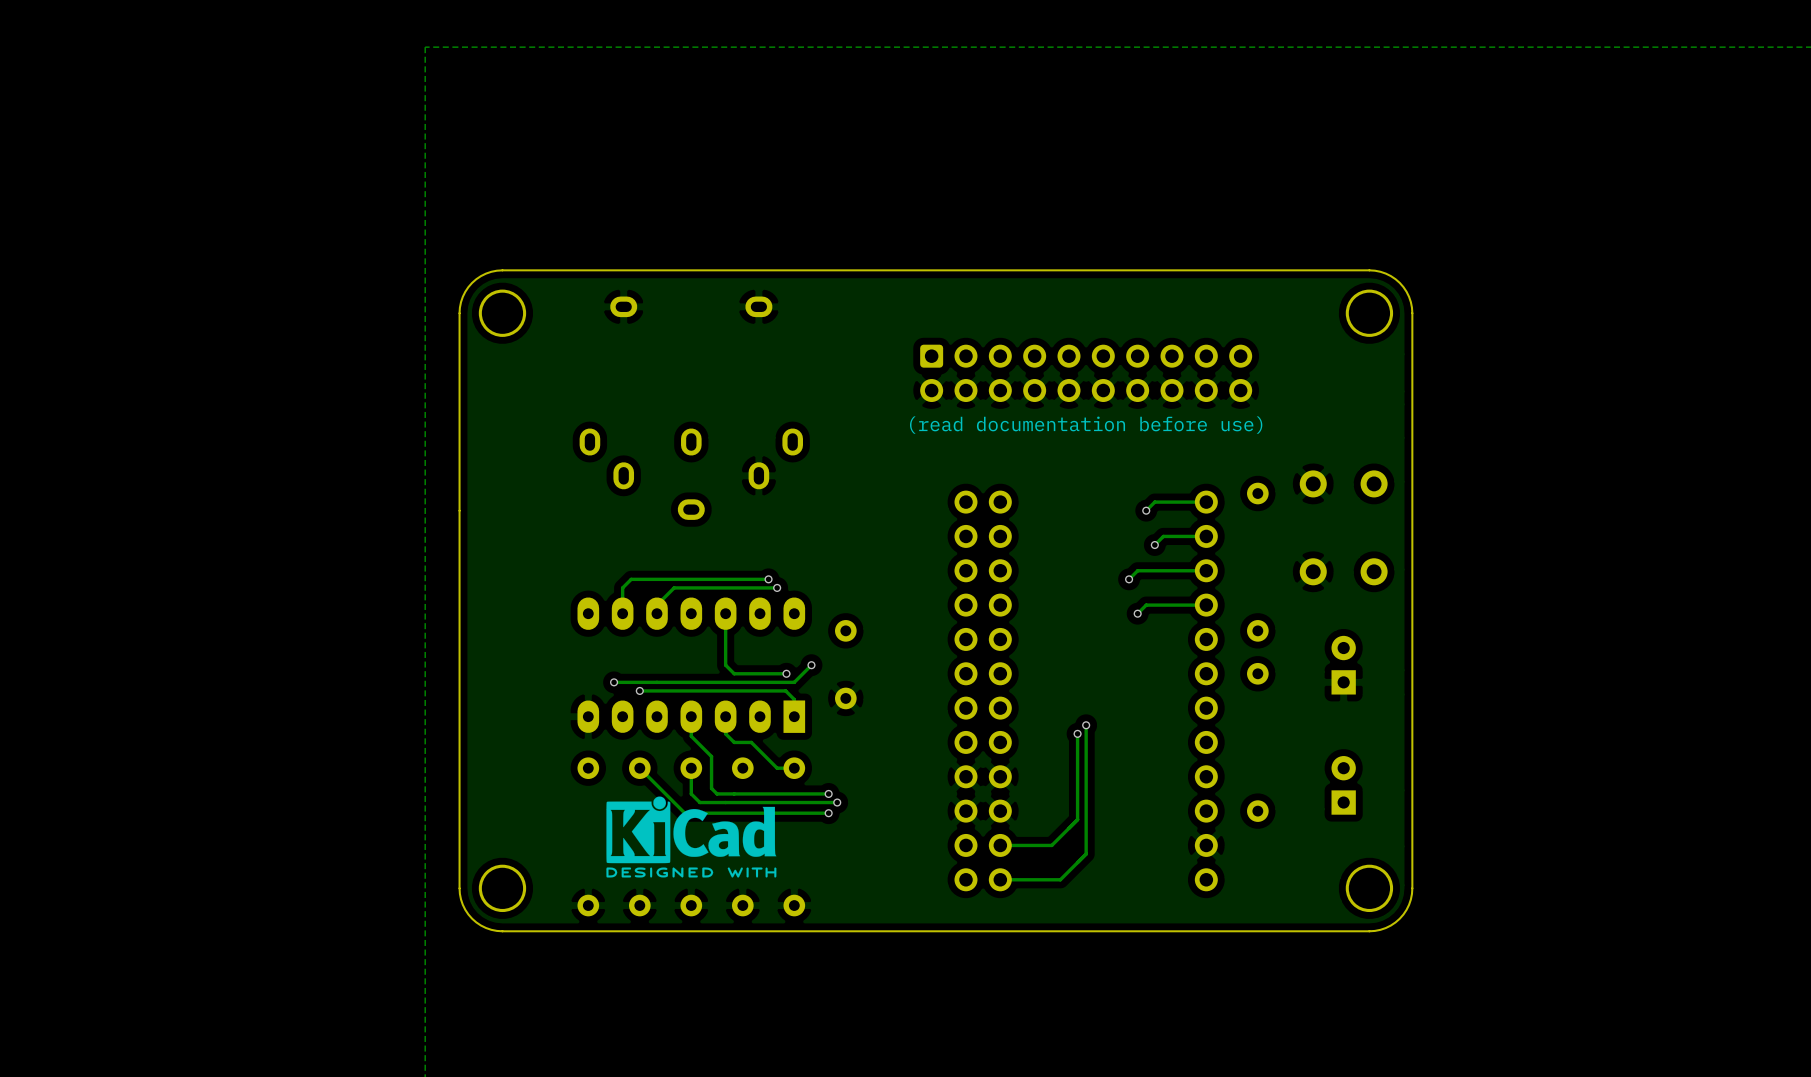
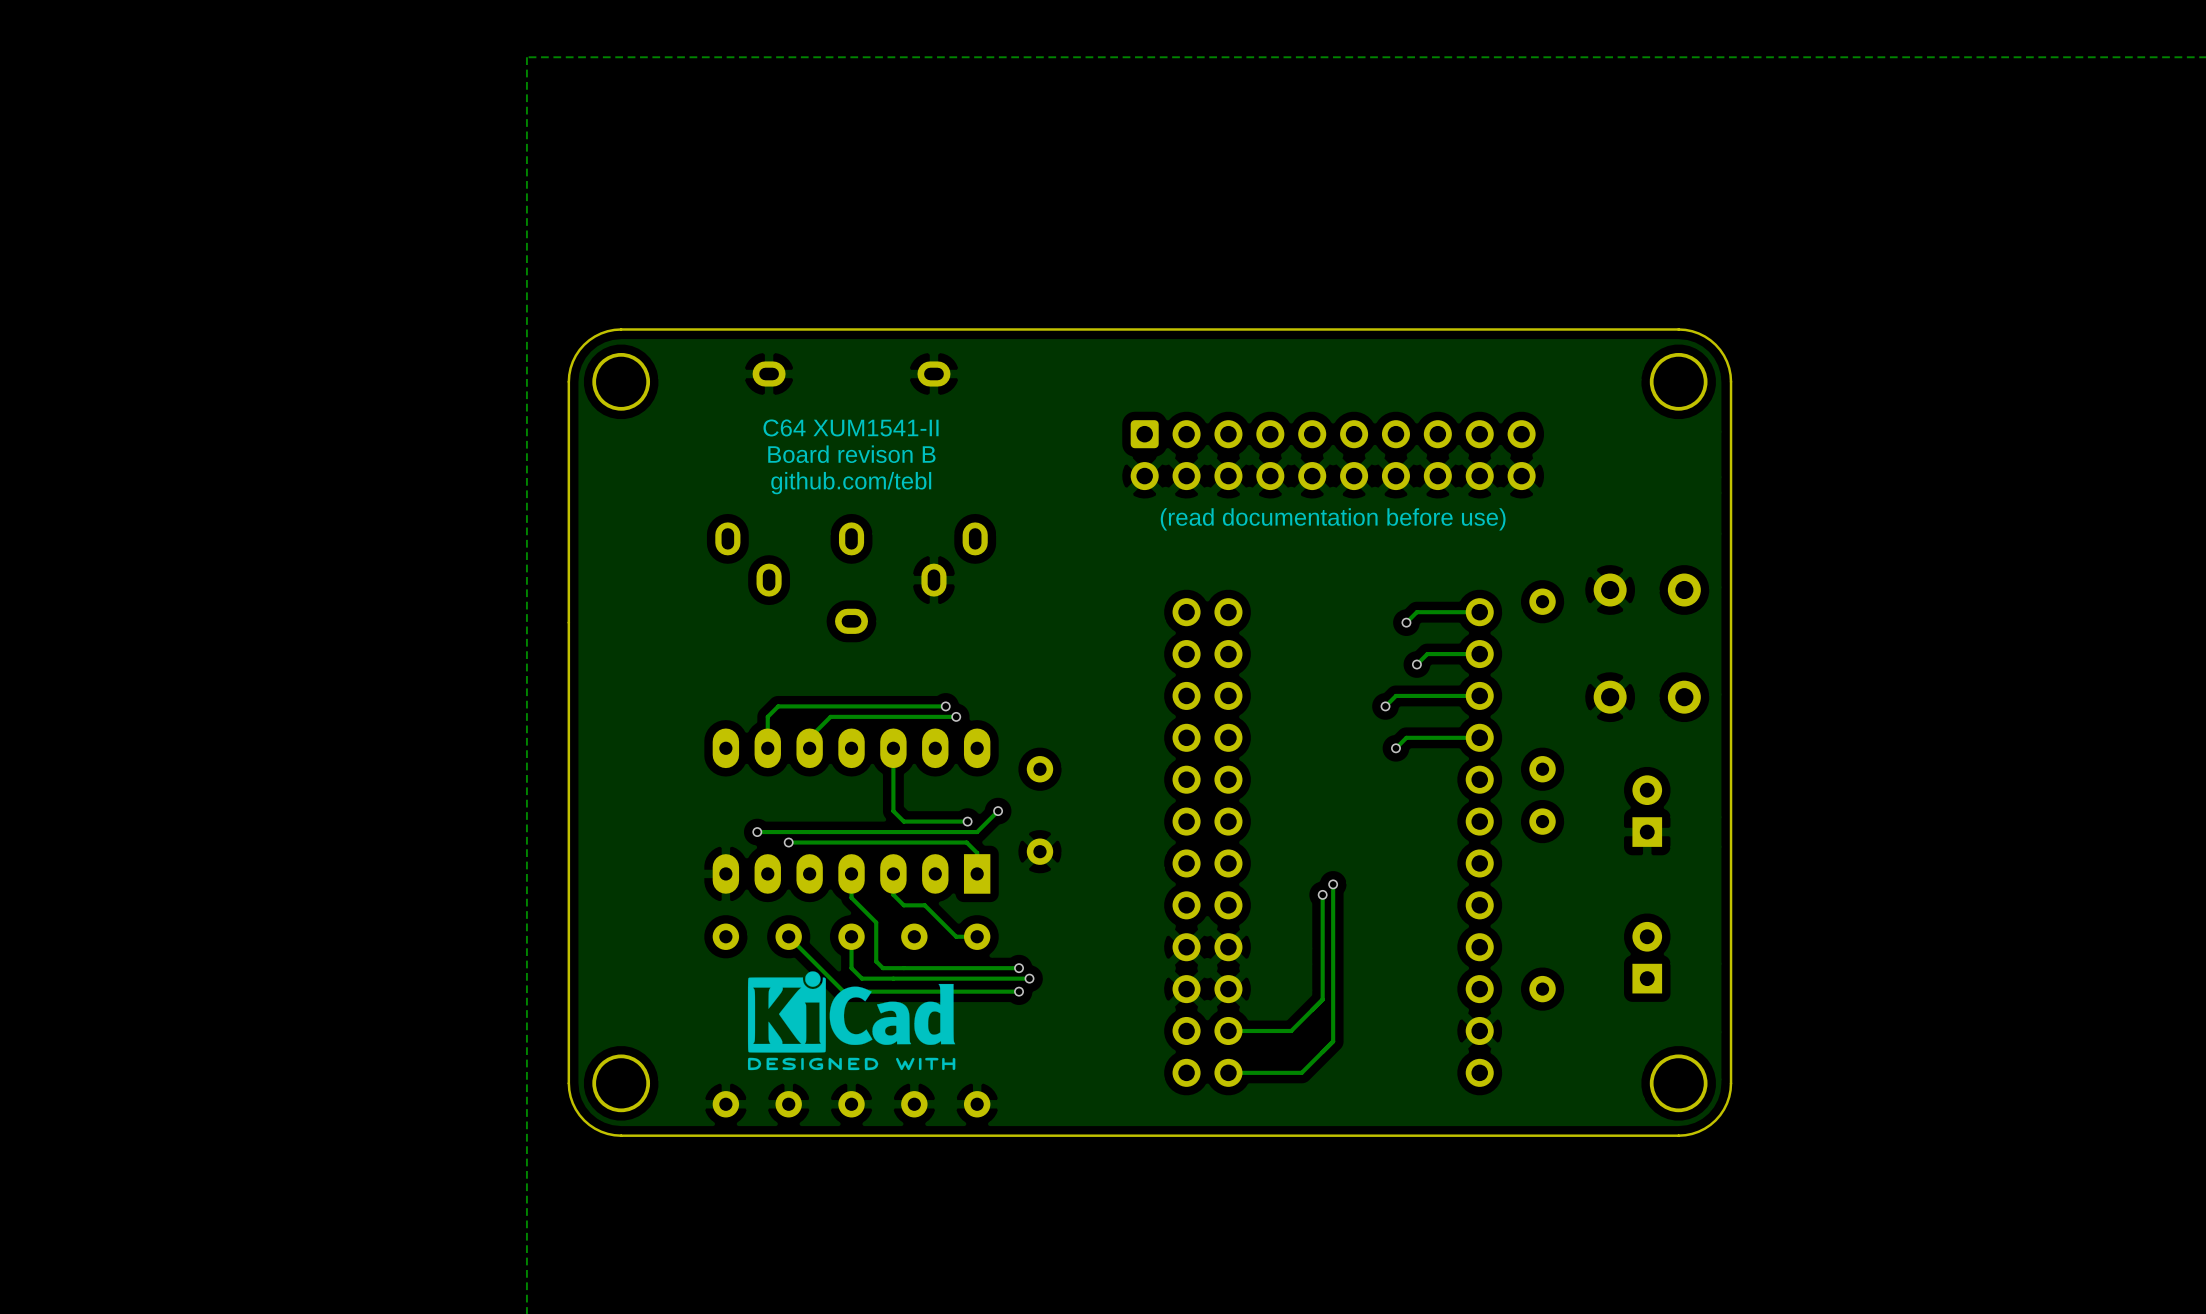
text: none -> C64 XUM1541-II (851, 427)
text: none -> Board revison B (851, 454)
text: none -> github.com/tebl (851, 483)

